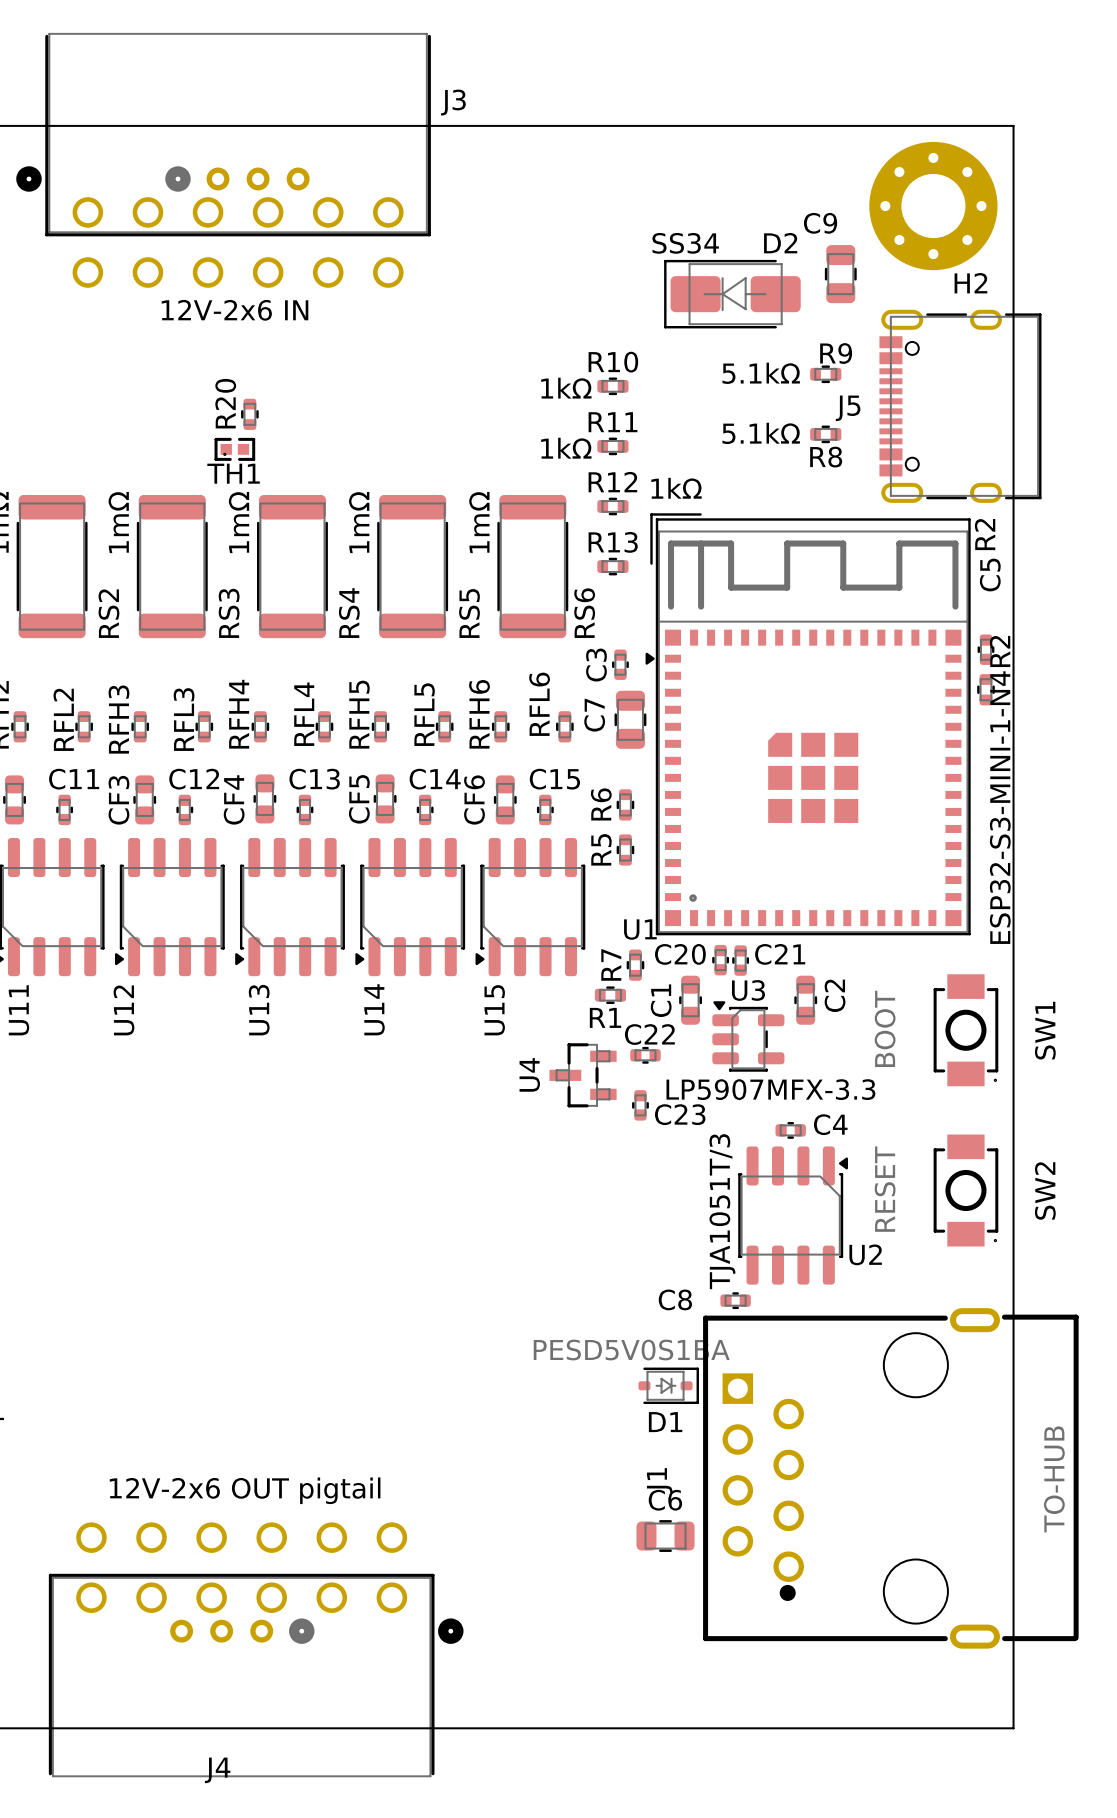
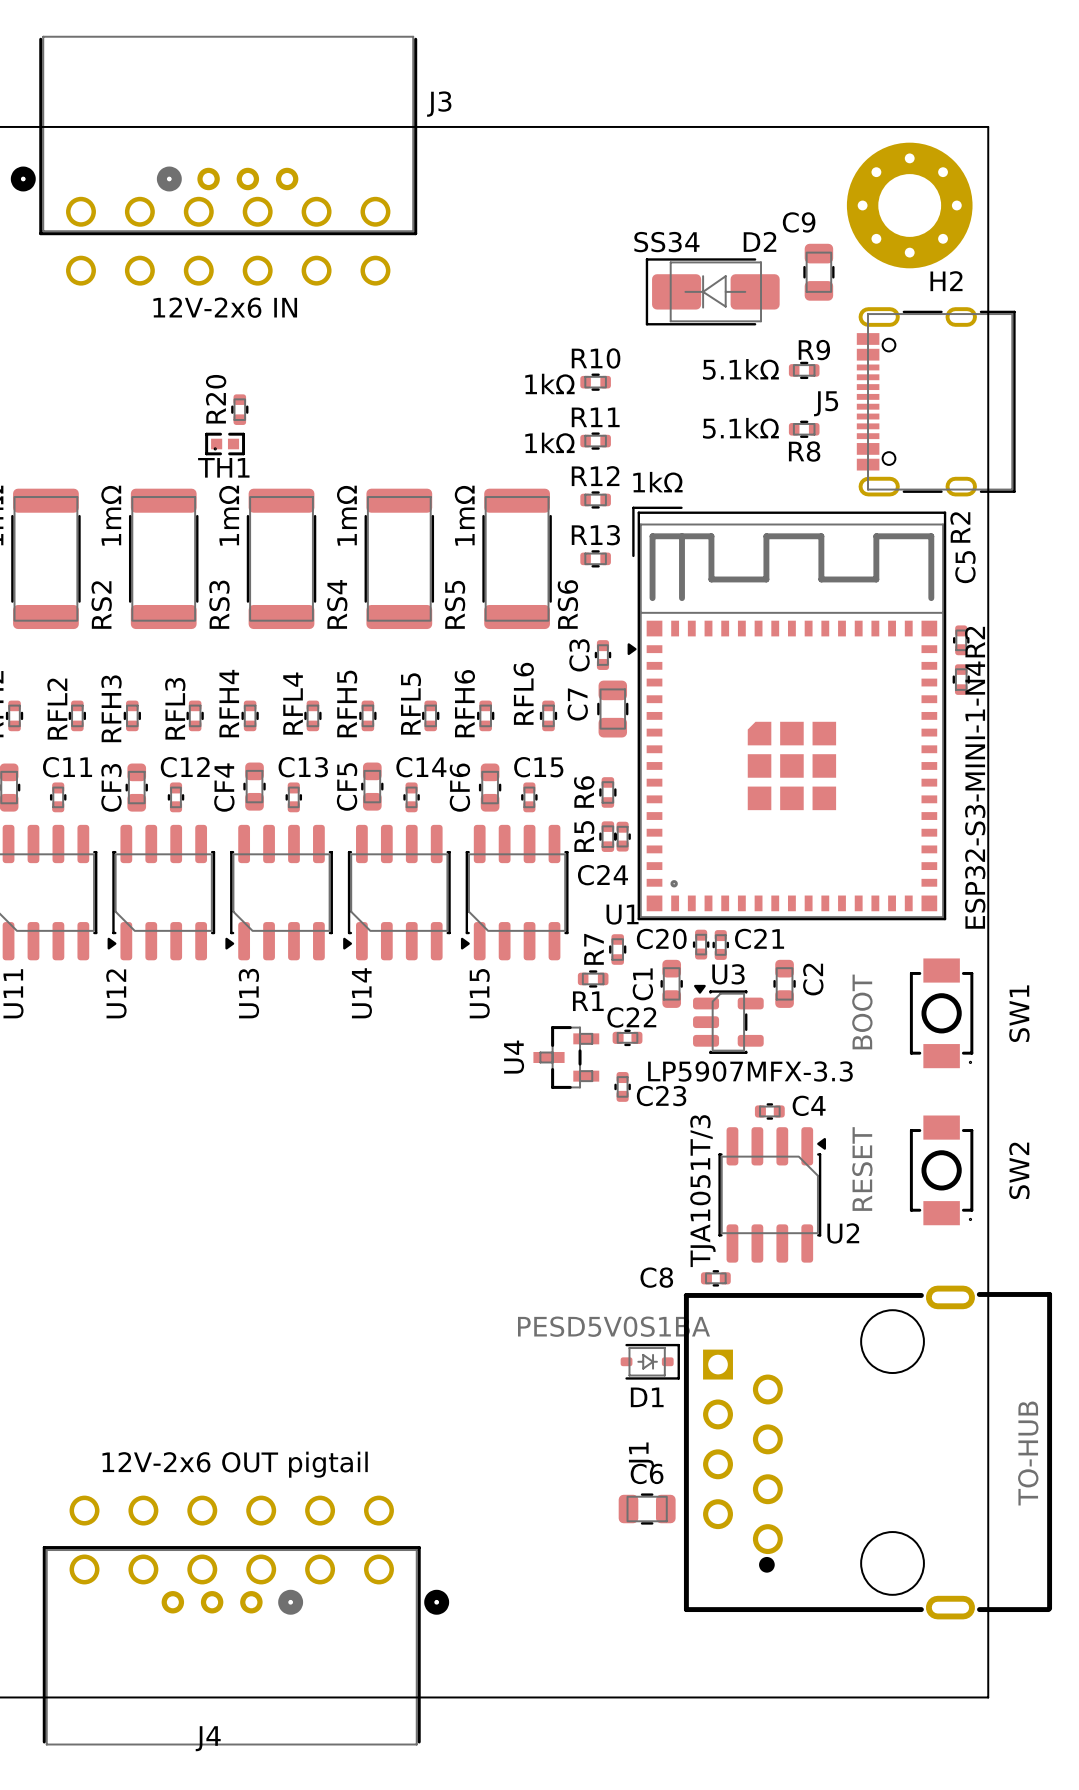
C24: none -> (622, 836)

